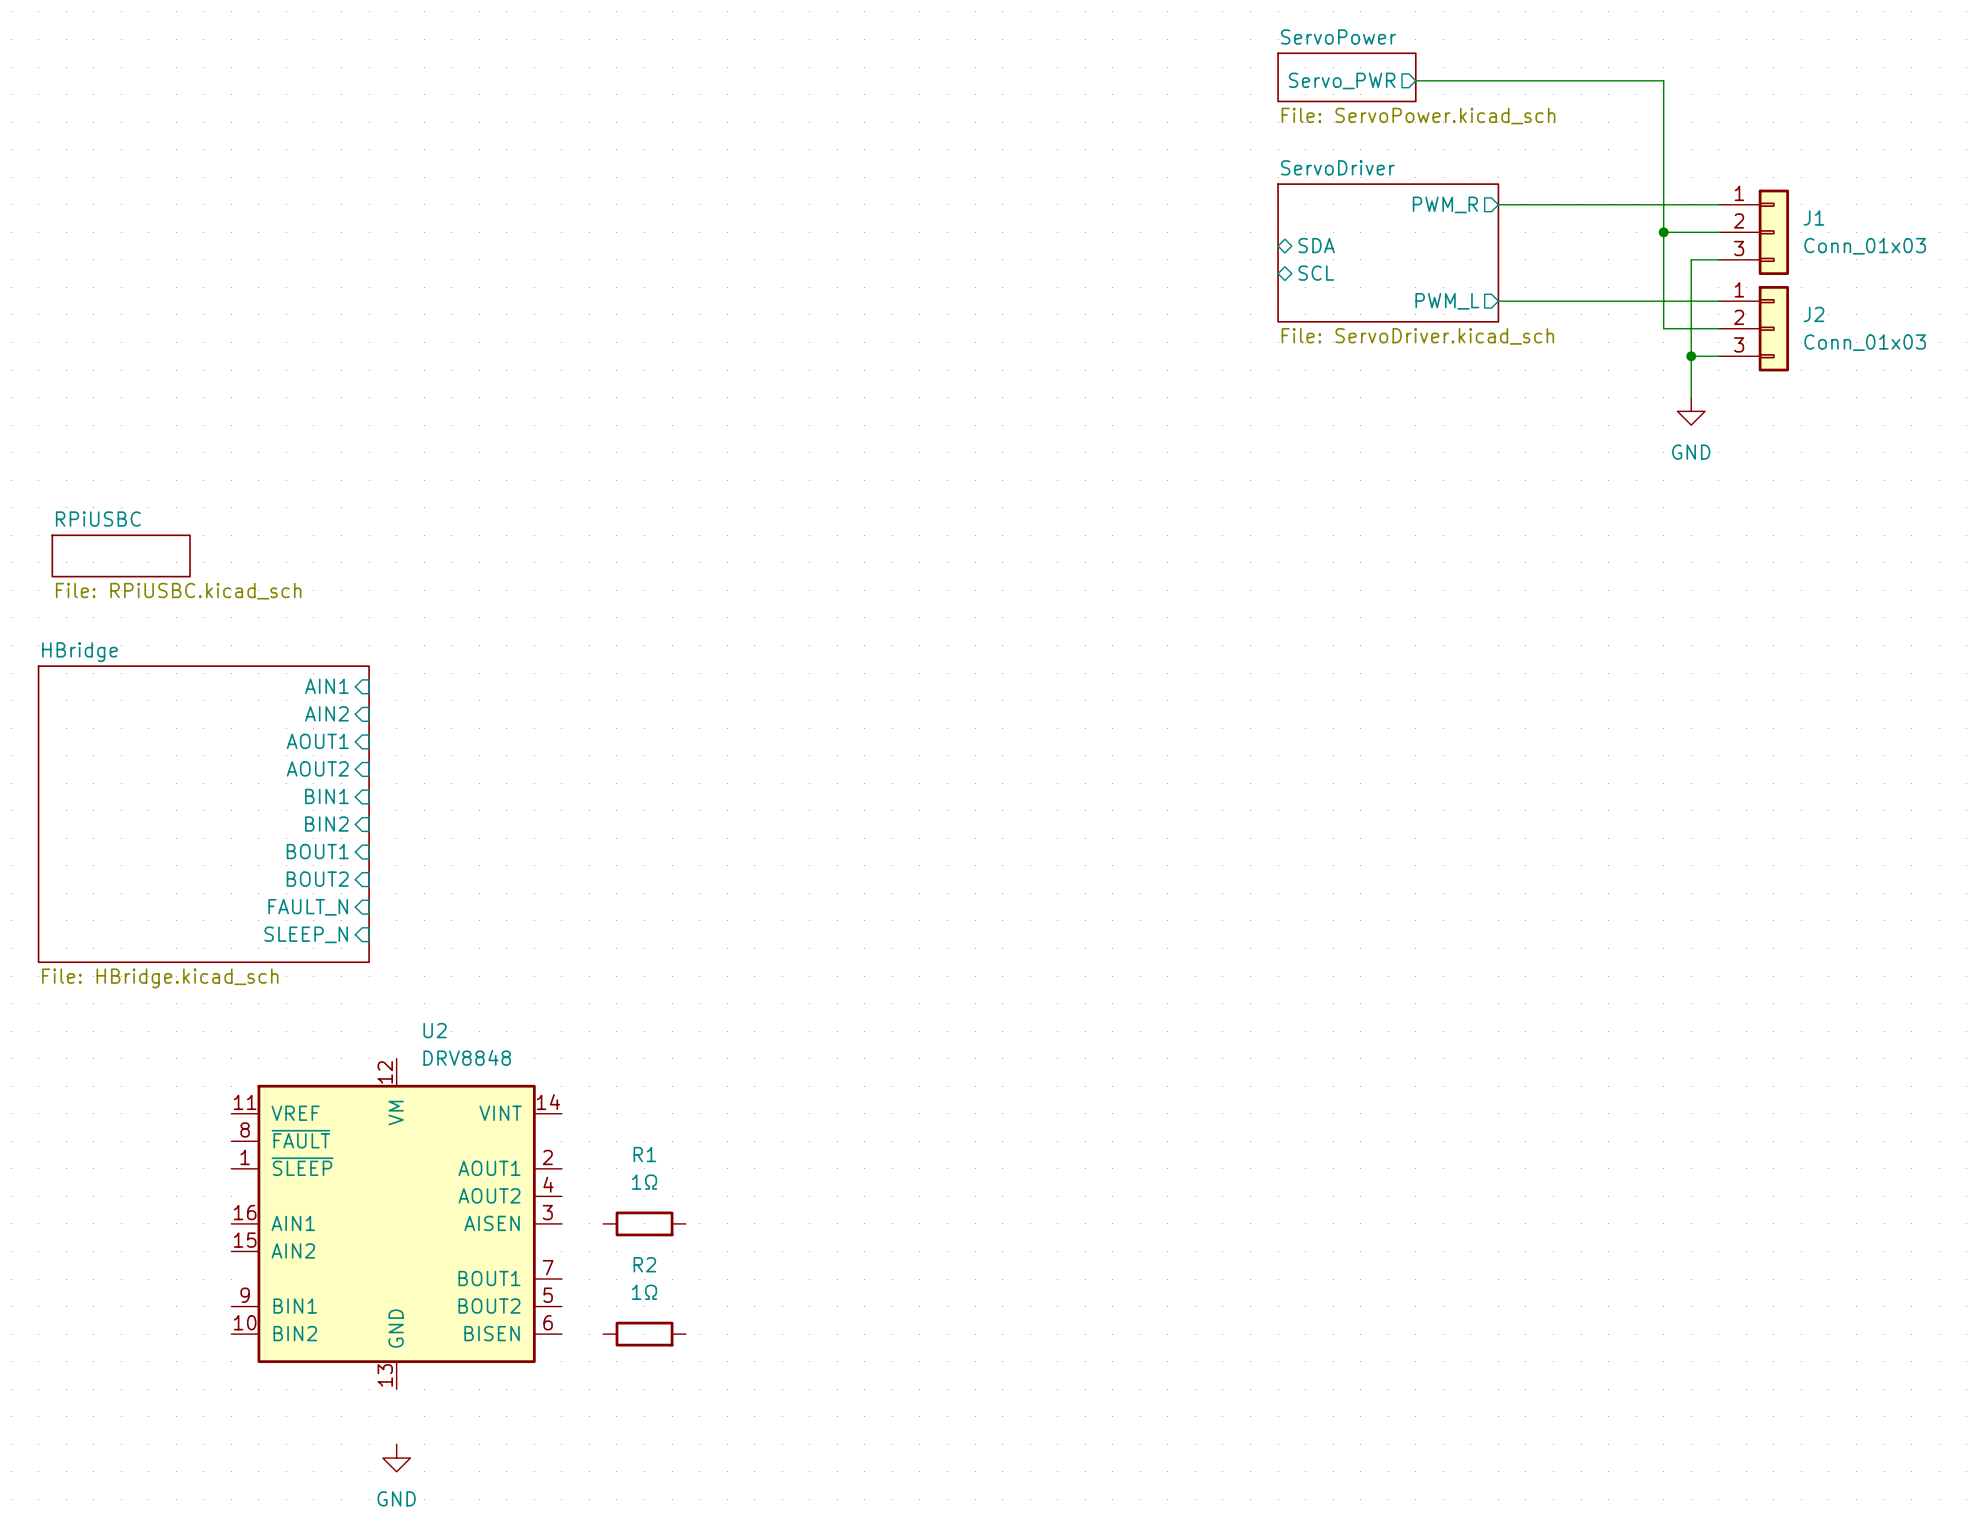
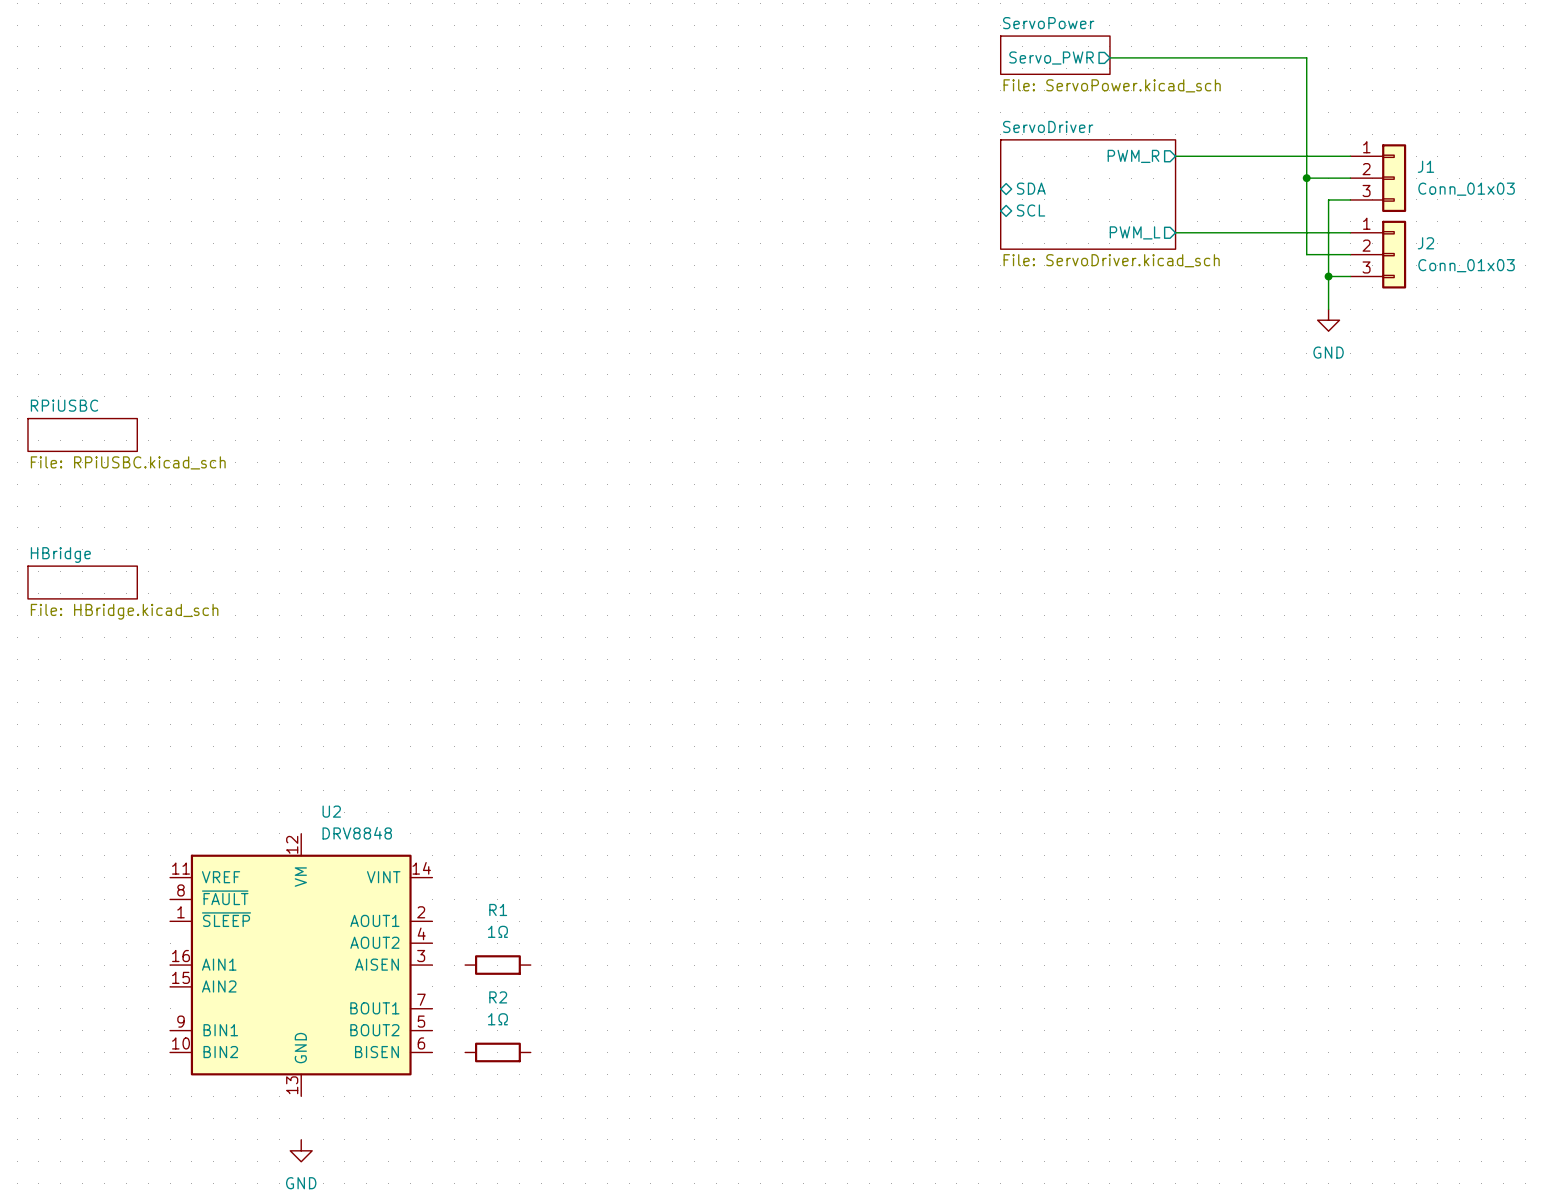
sheet pin: AIN1 (326, 686) -> none
sheet pin: AIN2 (326, 713) -> none
sheet HBridge: none -> File: HBridge.kicad_sch (82, 582)
sheet pin: AOUT1 (317, 741) -> none
sheet pin: AOUT2 (317, 768) -> none
sheet pin: BIN1 (326, 796) -> none
sheet HBridge: File: HBridge.kicad_sch (203, 814) -> none
sheet pin: BIN2 (326, 824) -> none
sheet pin: BOUT1 (317, 851) -> none
sheet pin: BOUT2 (317, 879) -> none
sheet pin: FAULT_N (308, 907) -> none
sheet pin: SLEEP_N (306, 934) -> none

